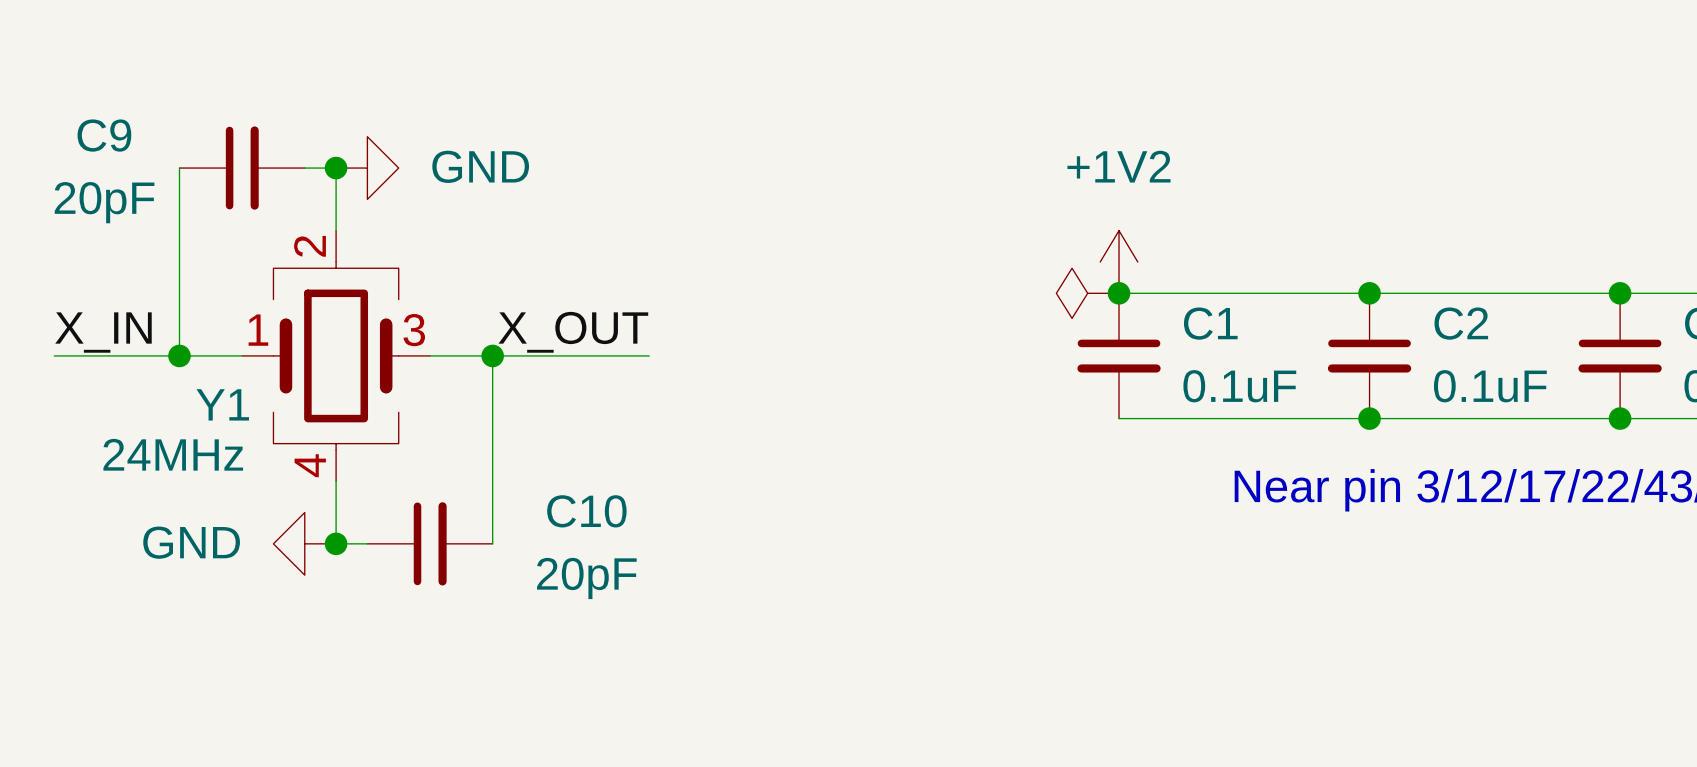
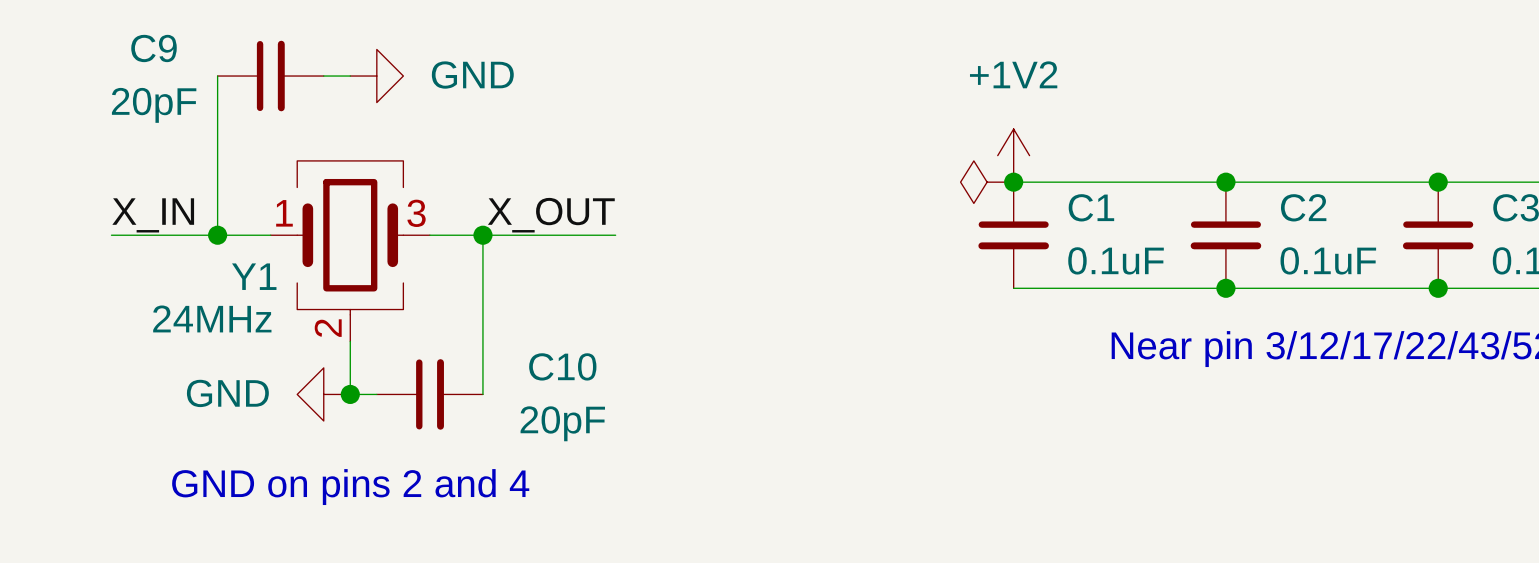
wire: (336, 168) (336, 230) -> none
junction: (336, 168) -> none
Y1 symbol: [242, 230, 431, 482] -> [270, 160, 430, 342]
text: none -> GND on pins 2 and 4 (350, 487)

